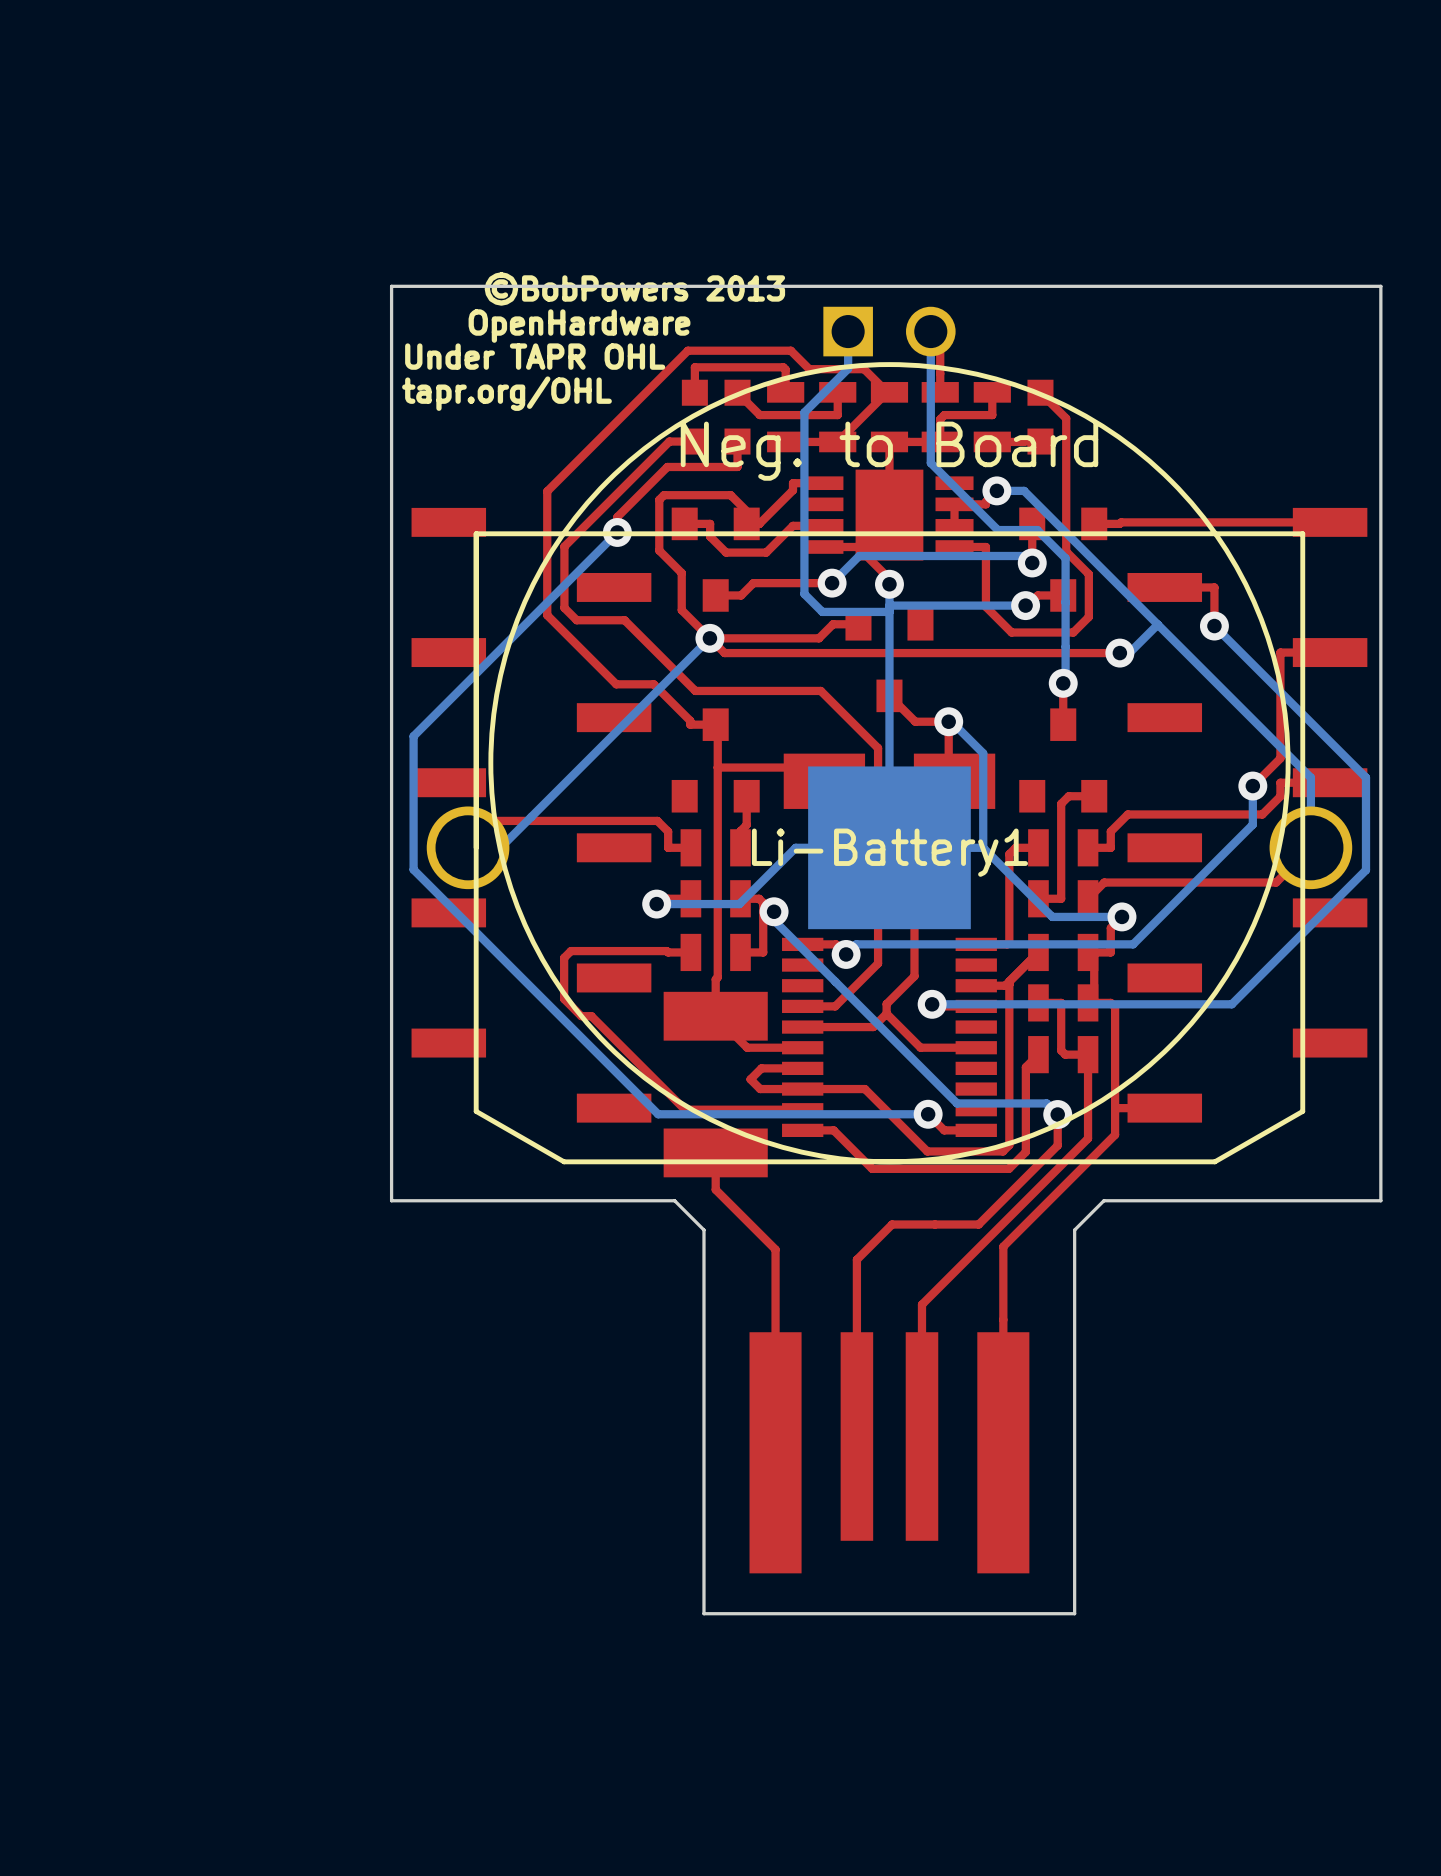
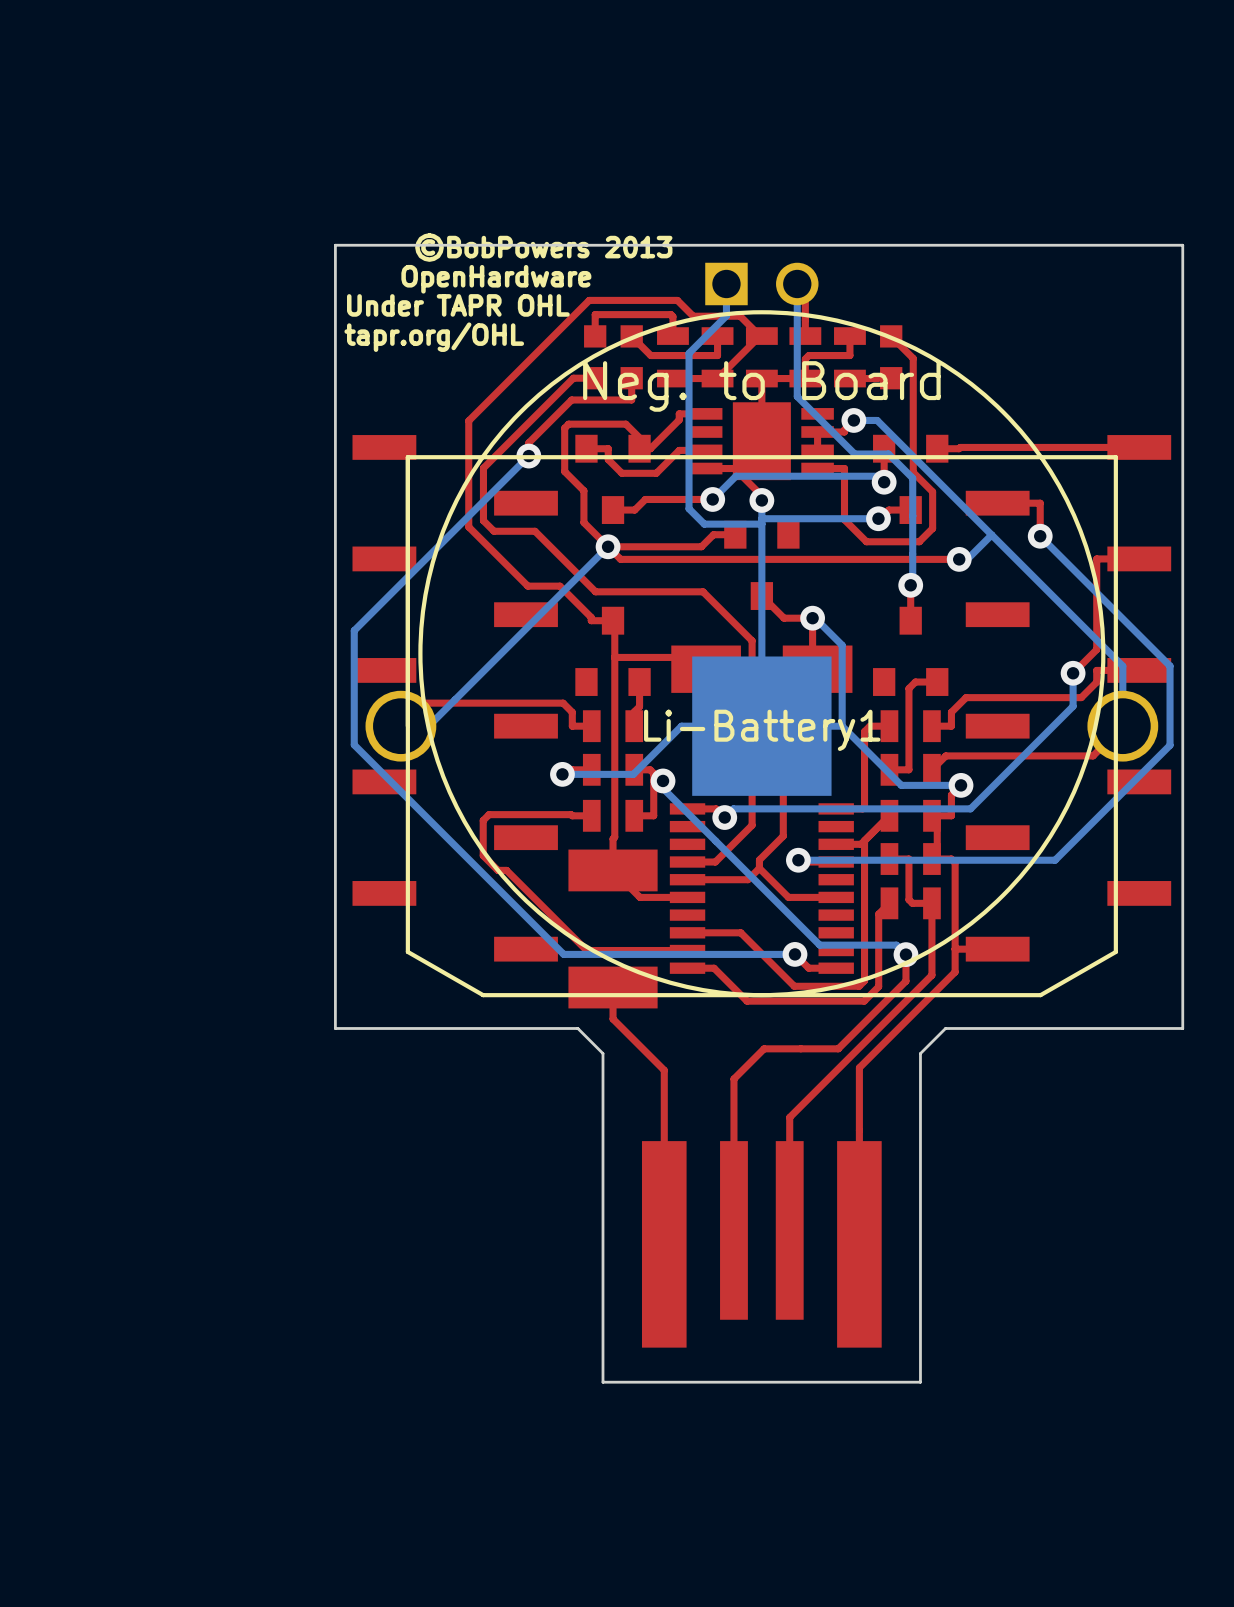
top track: (802, 1068) (761, 1068) (750, 1079) (760, 1089) (802, 1089) -> none

